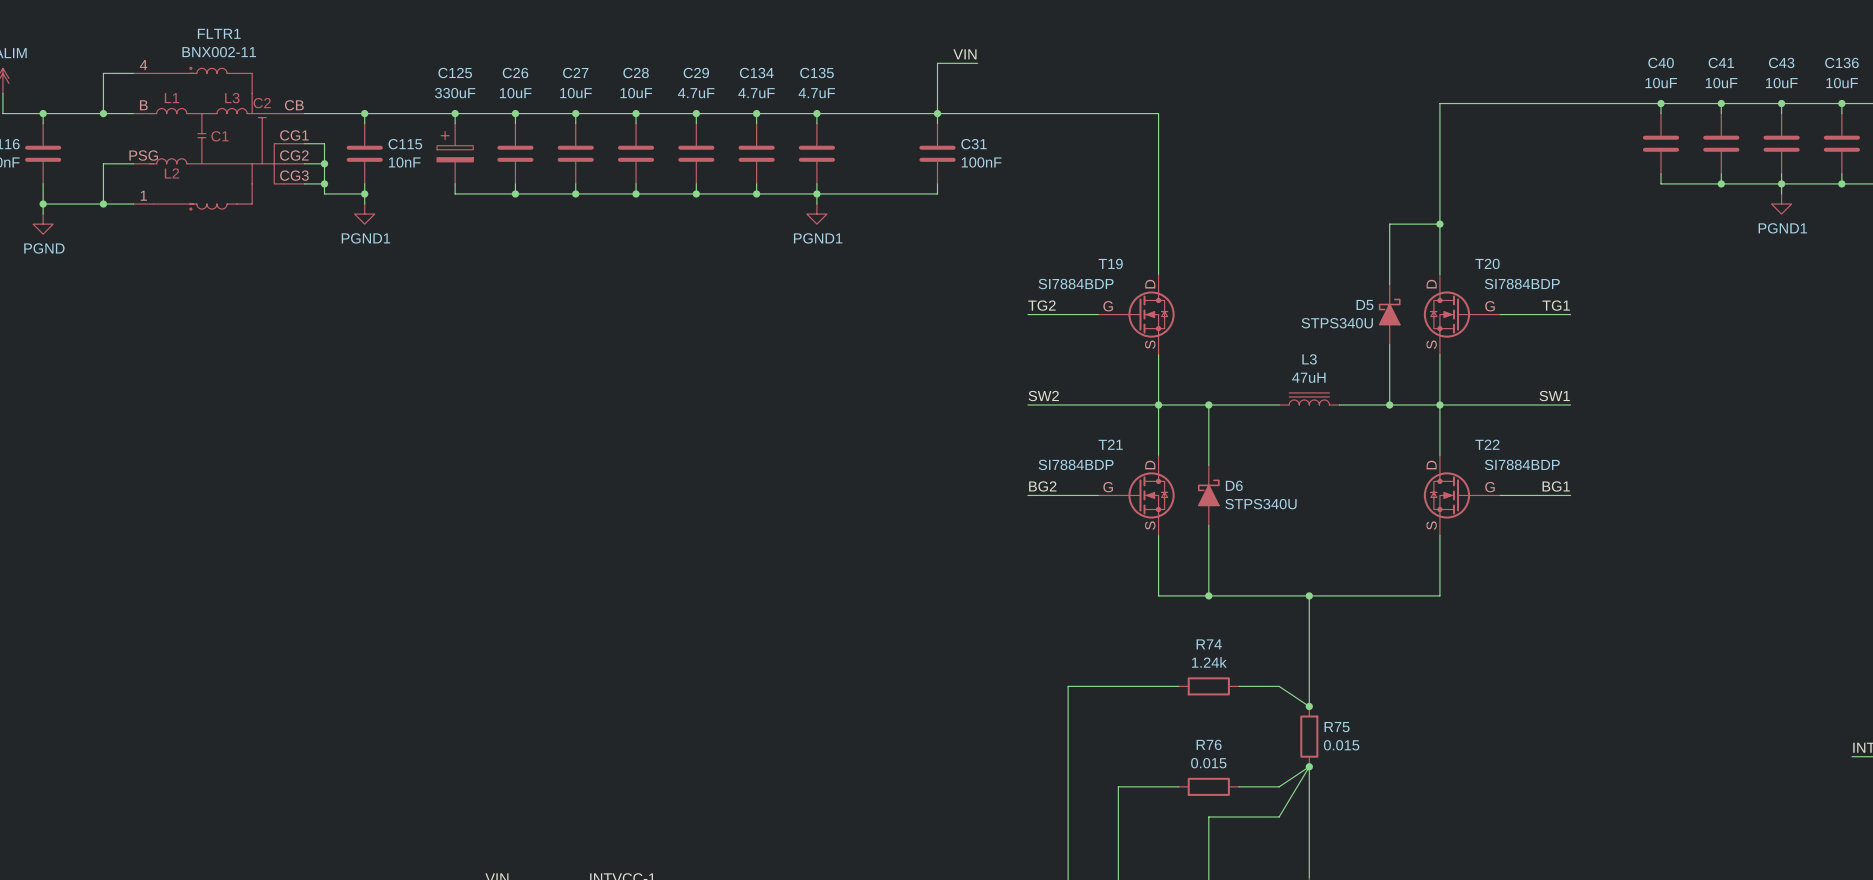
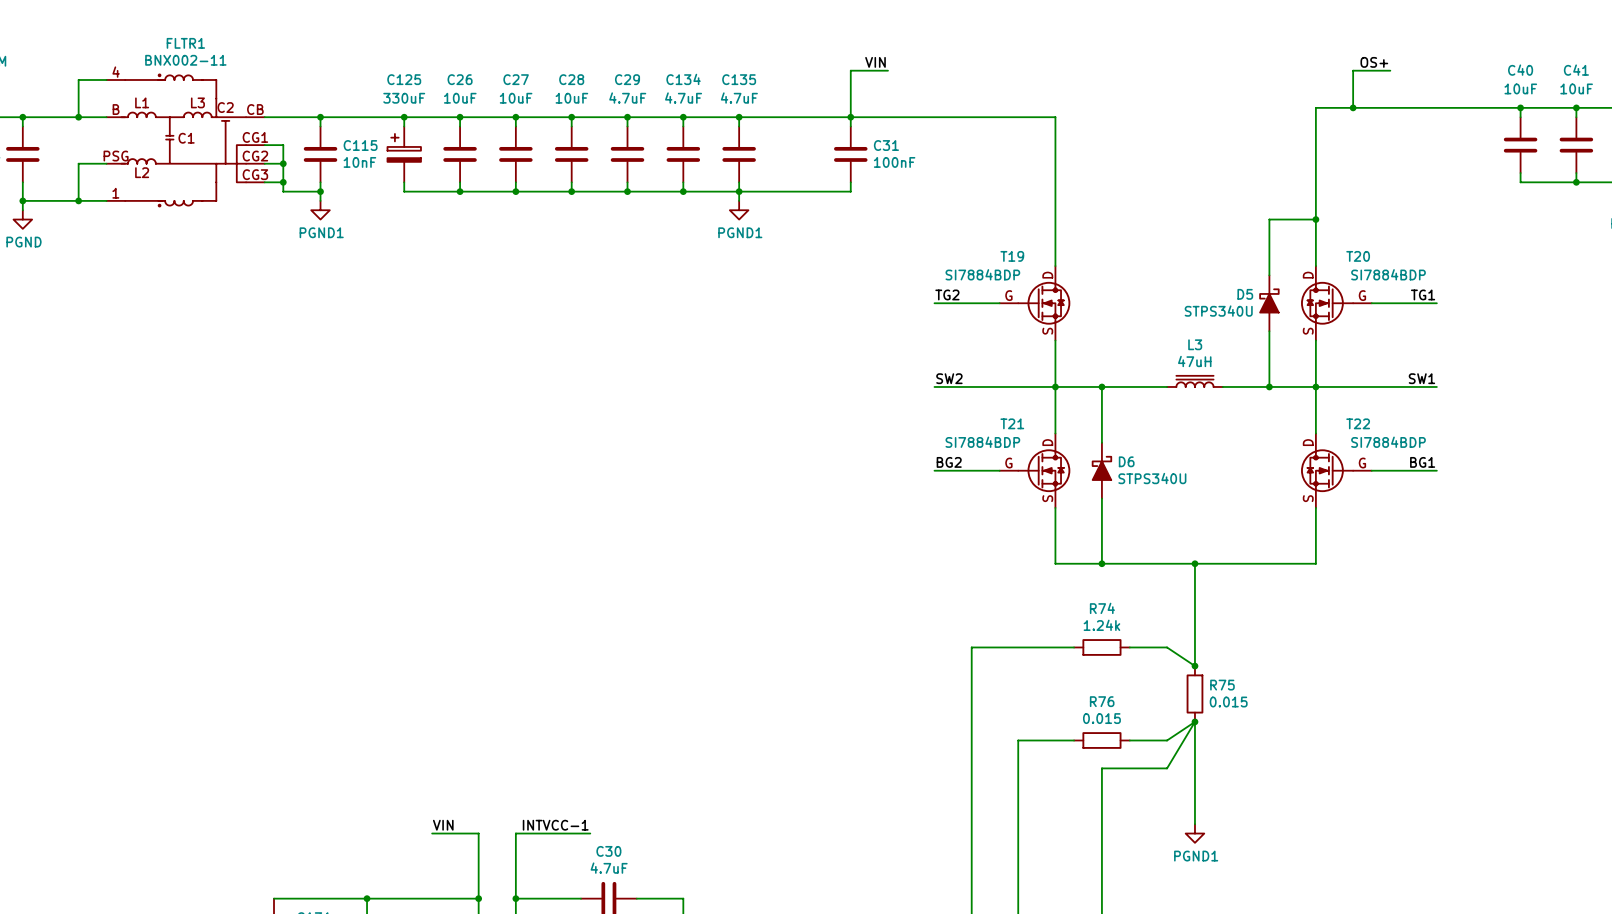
label: none -> OS+ (1374, 62)
wire: none -> (1390, 70) (1353, 70) (1353, 107)
junction: none -> (1353, 107)

